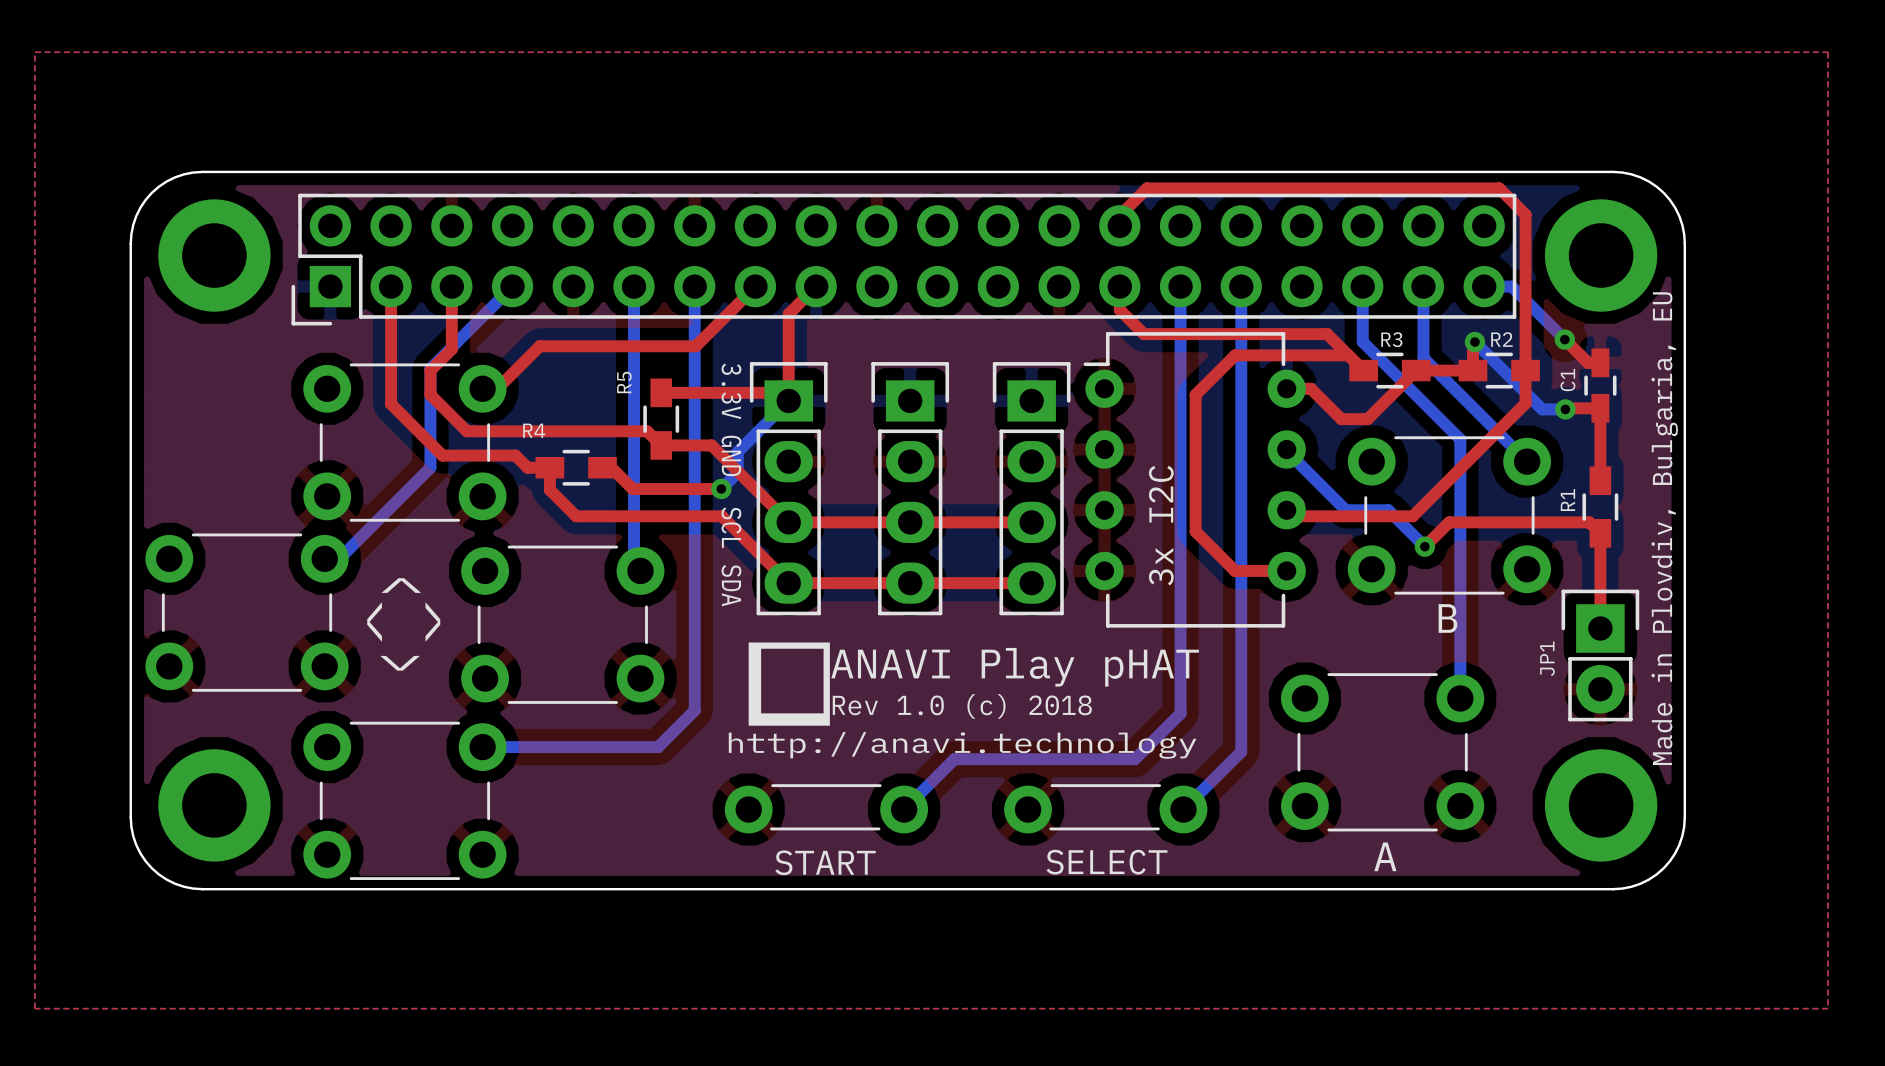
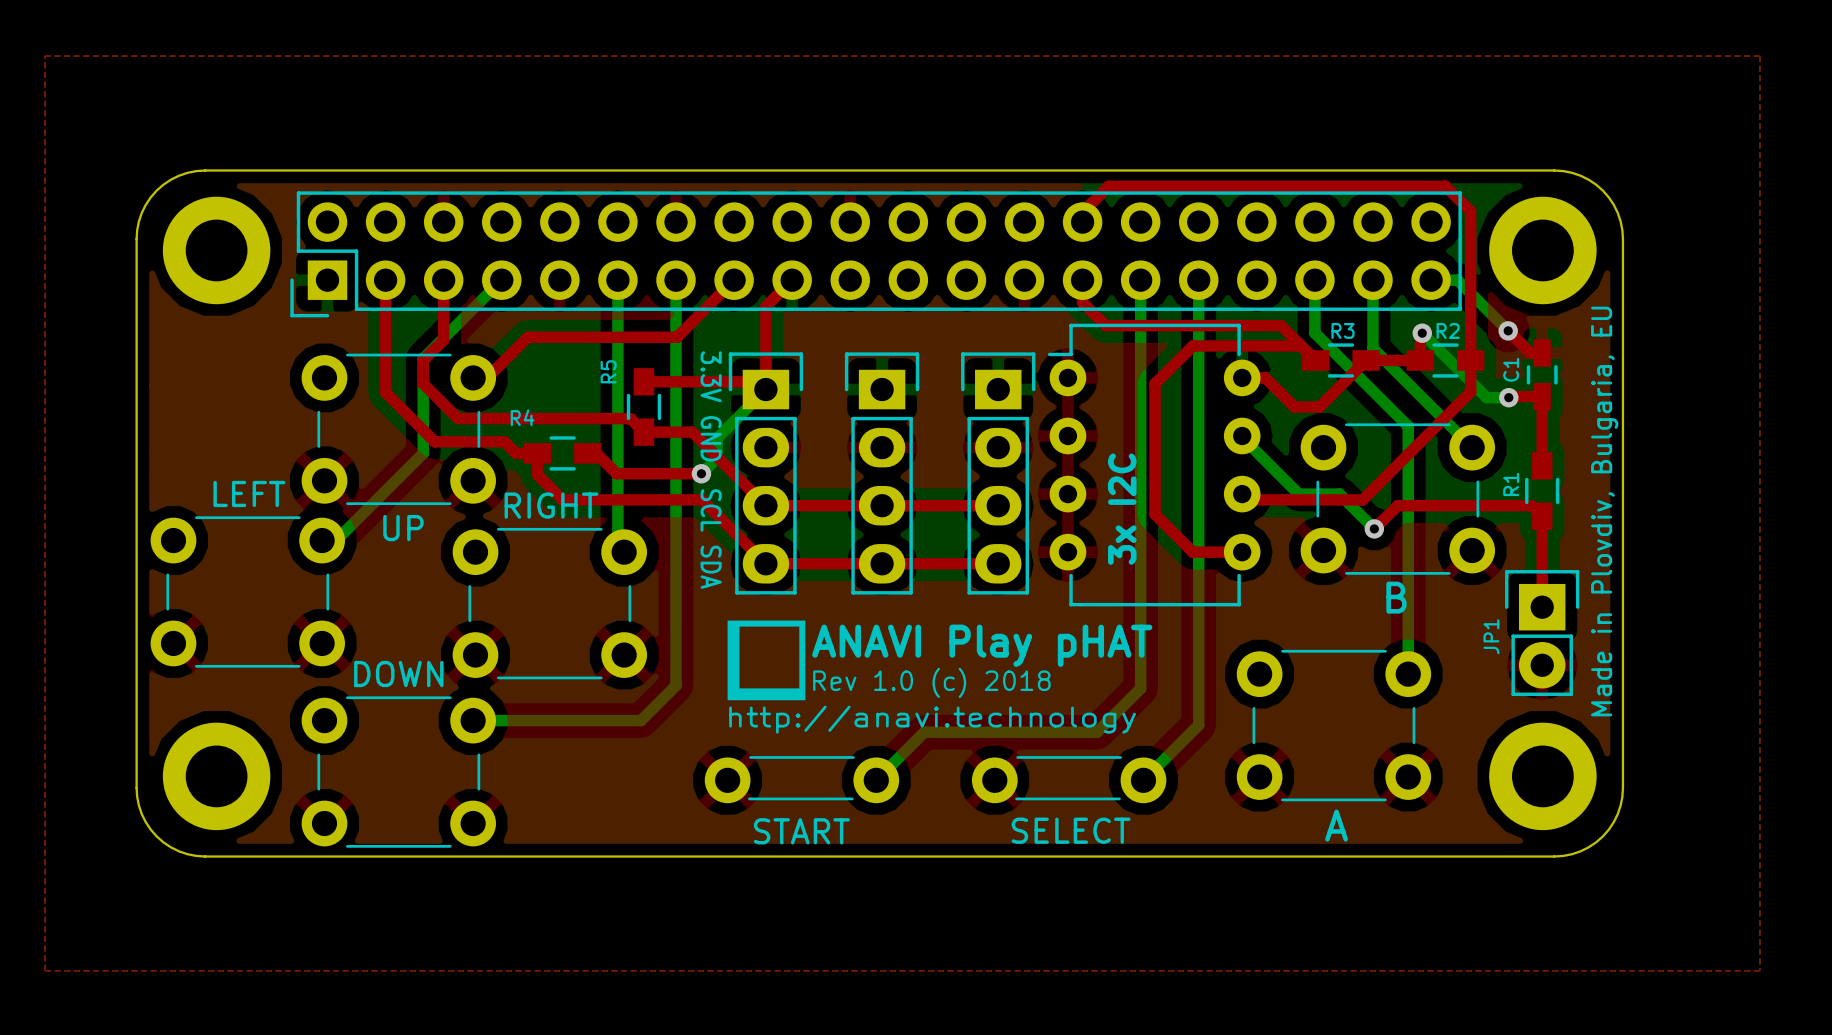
UP name: > (401, 585) -> UP (403, 528)
LEFT name: < (374, 621) -> LEFT (249, 493)
RIGHT name: > (432, 621) -> RIGHT (551, 505)
DOWN name: < (400, 663) -> DOWN (398, 674)

